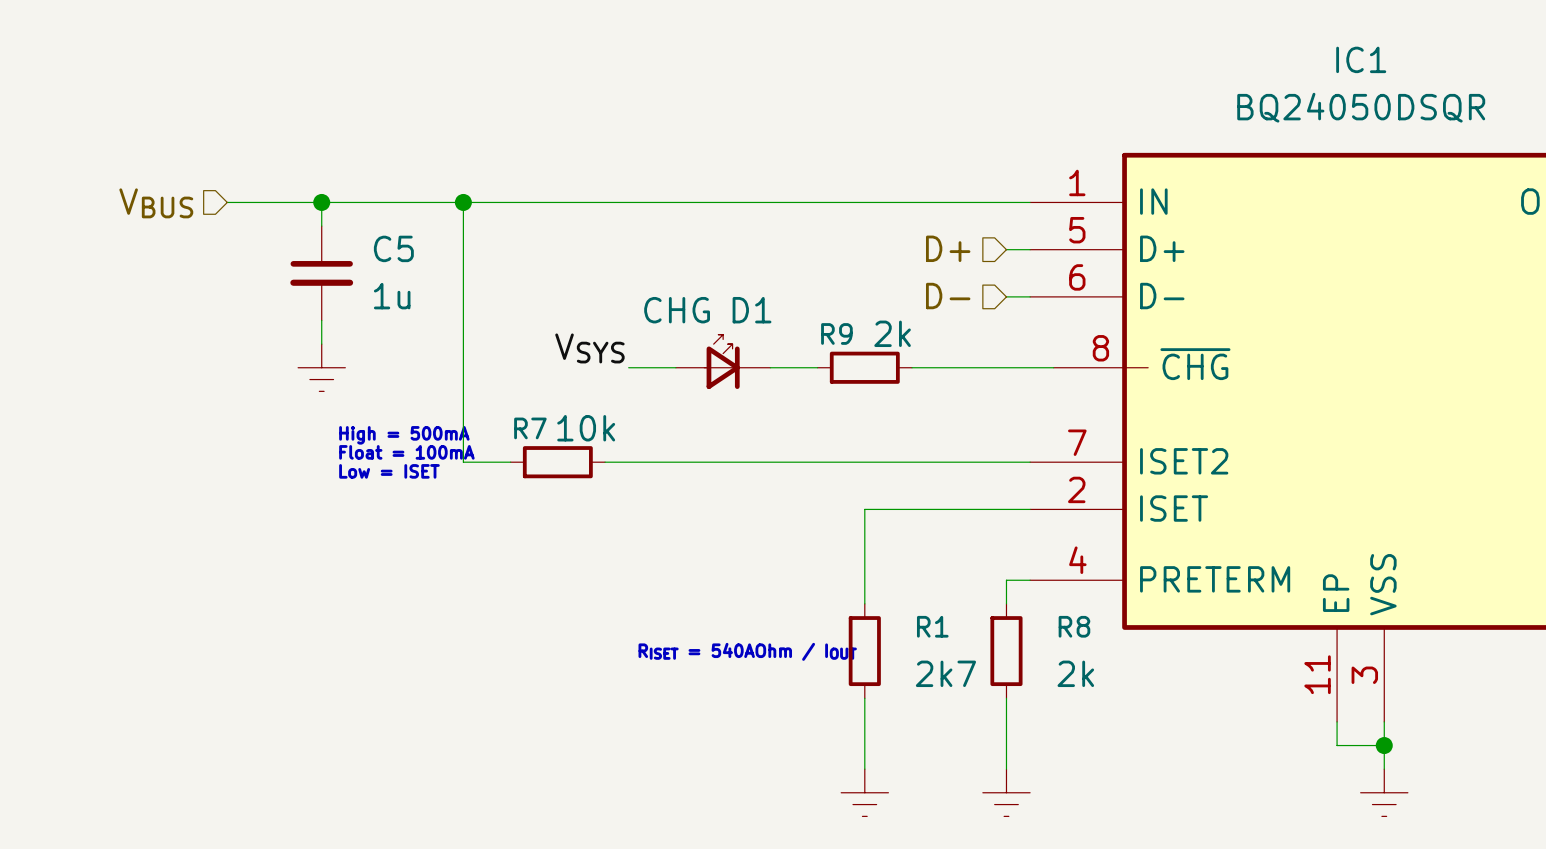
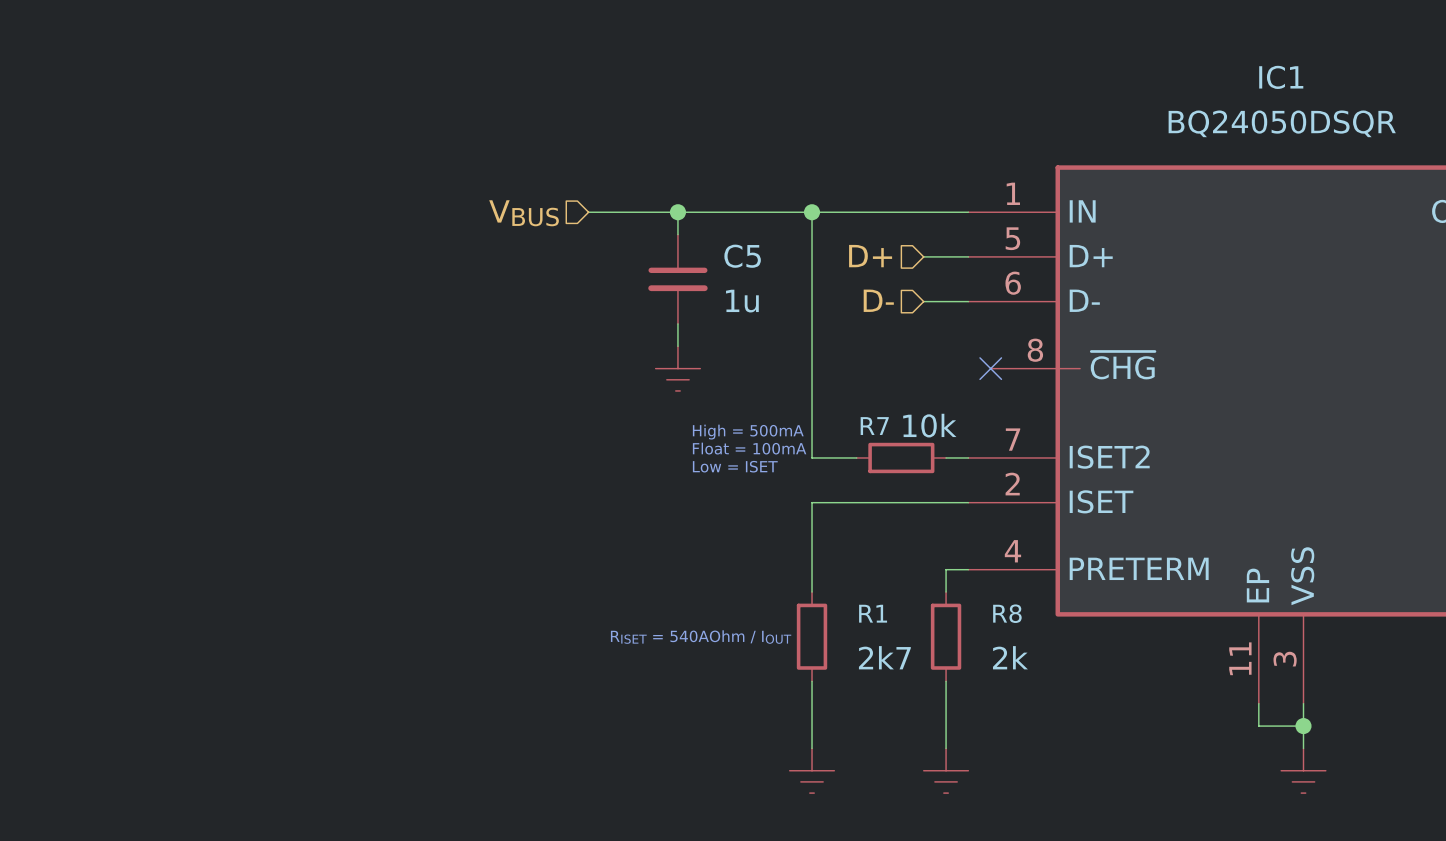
wire: (227, 202) (628, 202) -> none
wire: (321, 202) (321, 226) -> (677, 212) (677, 234)
junction: (321, 202) -> none
wire: (463, 202) (463, 462) (510, 462) -> none
junction: (463, 202) -> none
junction: none -> (677, 212)
junction: none -> (812, 212)
hierarchical label position: VBUS (156, 203) -> VBUS (524, 213)
hierarchical label position: D+ (948, 248) -> D+ (870, 256)
wire: none -> (923, 256) (946, 256)
C5 position: (321, 273) -> (677, 279)
hierarchical label position: D- (948, 296) -> D- (878, 300)
wire: none -> (923, 301) (946, 301)
wire: (321, 320) (321, 344) -> (677, 323) (677, 346)
label: VSYS (589, 348) -> none
D1: CHG (723, 361) -> none
power symbol position: (321, 367) -> (677, 368)
wire: (628, 367) (675, 367) -> none
wire: (770, 367) (817, 367) -> none
R9: 2k (864, 367) -> none
wire: (912, 367) (1053, 367) -> none
no-connect mark: none -> (990, 368)
text position: High = 500mA (404, 435) -> High = 500mA (748, 432)
text position: Float = 100mA (406, 452) -> Float = 100mA (749, 448)
R7 position: (557, 462) -> (901, 457)
wire: (605, 462) (864, 462) -> (812, 212) (812, 457)
wire: (912, 462) (1006, 462) -> none
text position: Low = ISET (389, 471) -> Low = ISET (735, 466)

